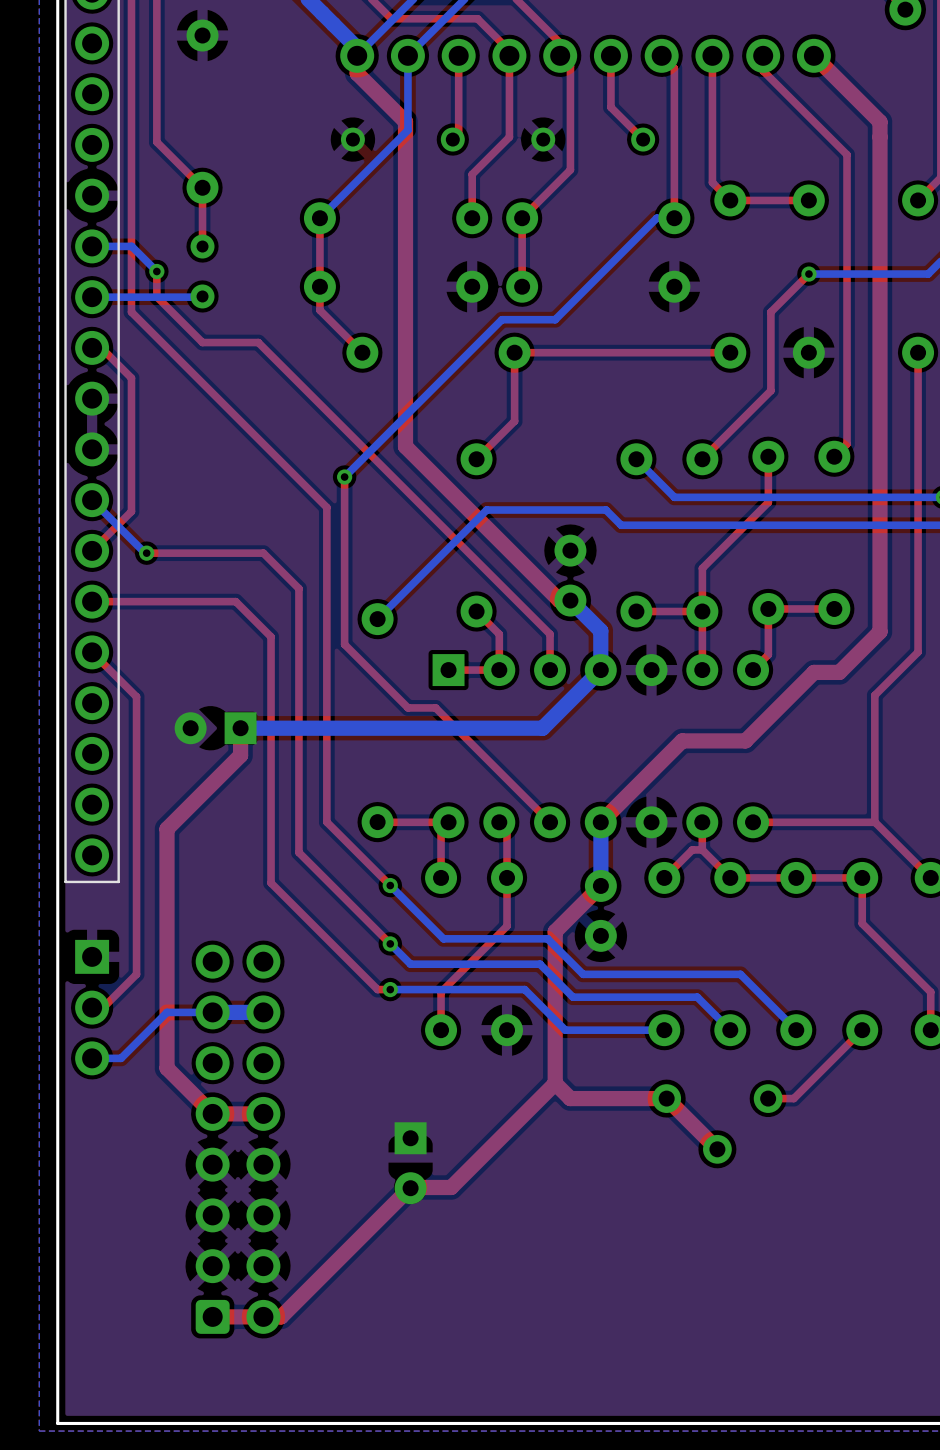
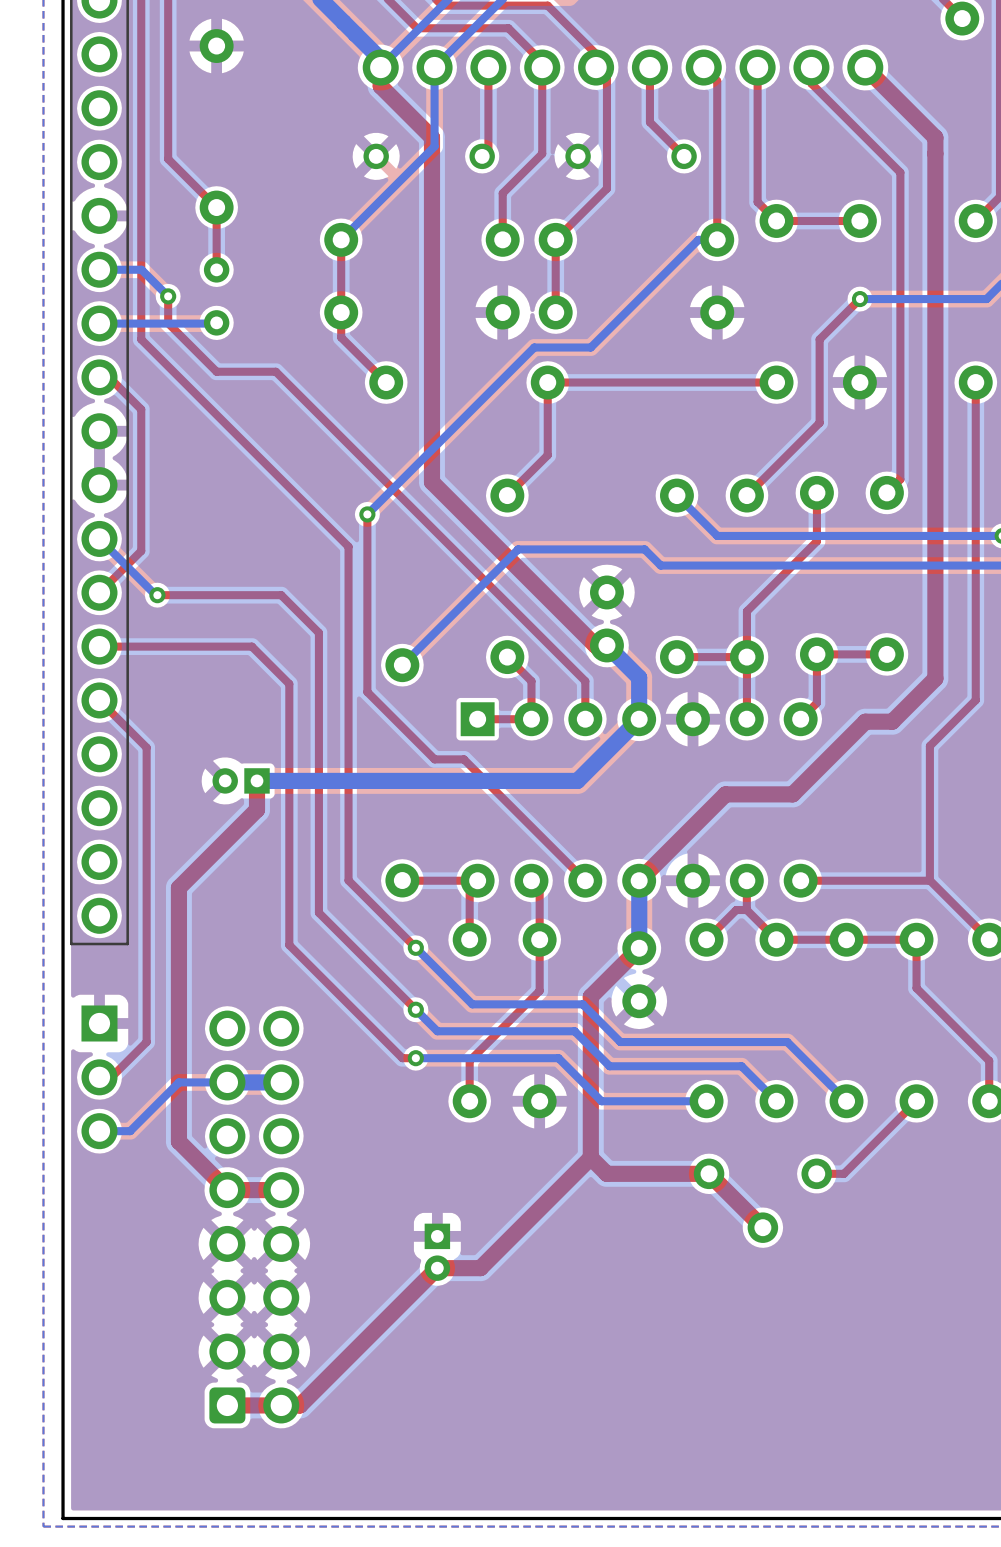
part footprint: [174, 712, 257, 745] -> [212, 768, 270, 794]
part footprint: [394, 1122, 427, 1205] -> [424, 1223, 451, 1281]

